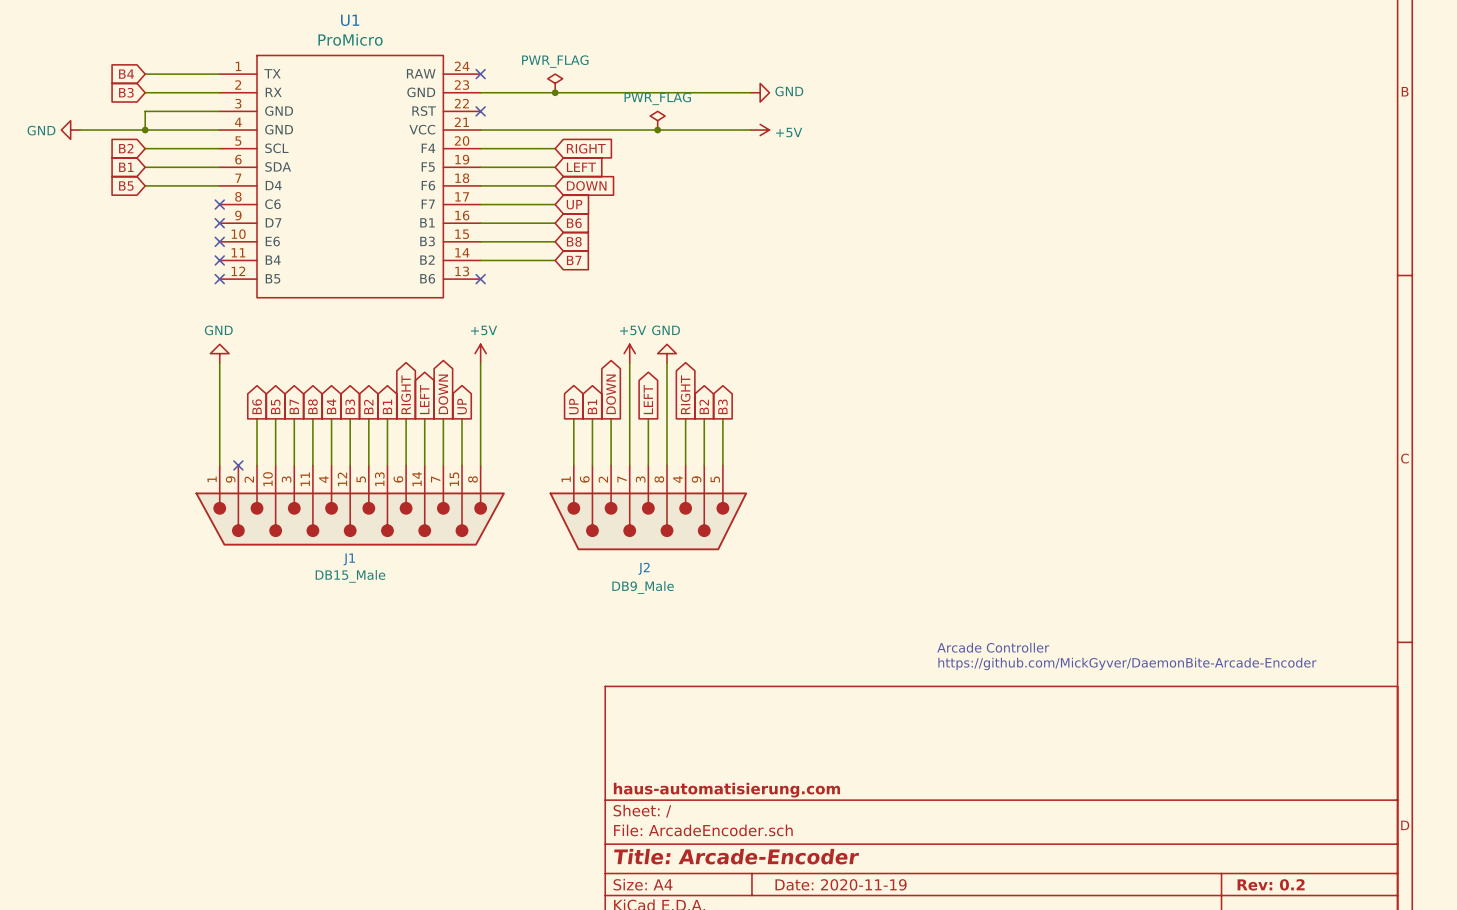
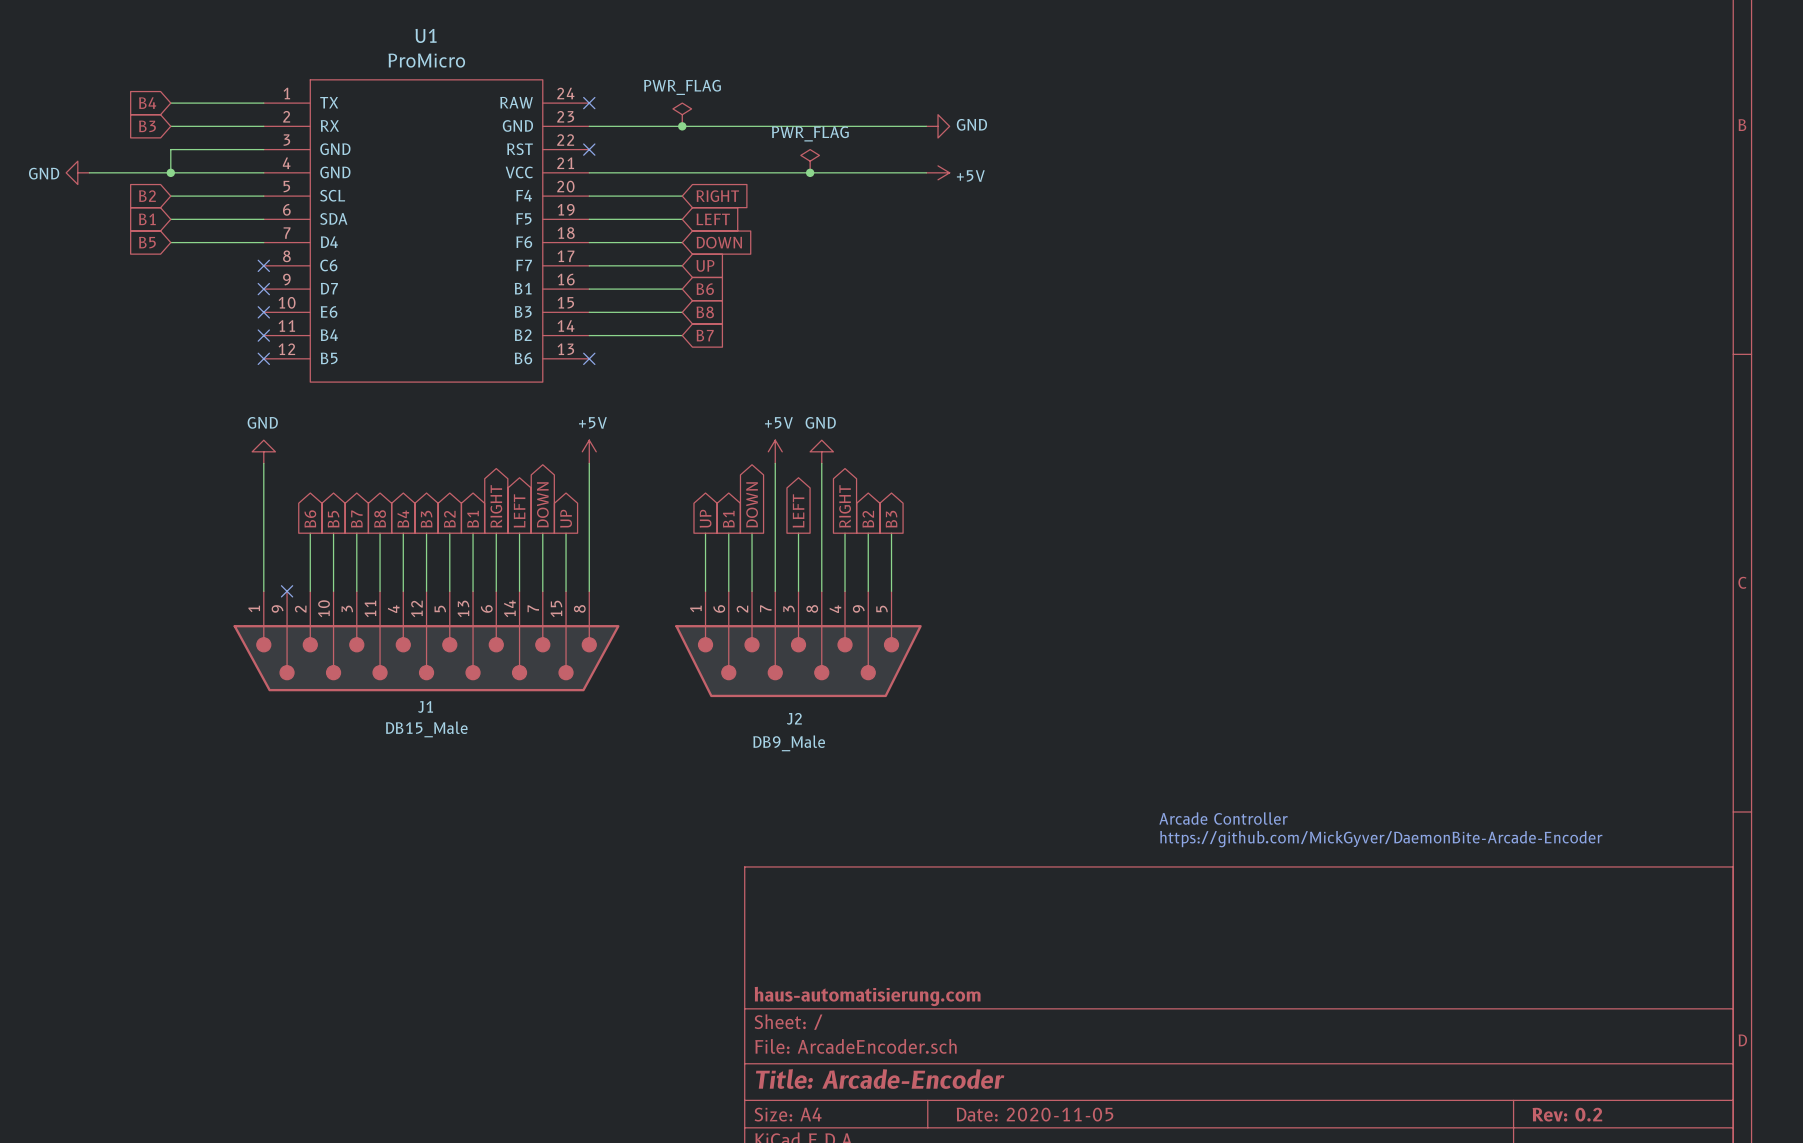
title block: Date: 2020-11-19 (841, 884) -> Date: 2020-11-05 (1035, 1114)

